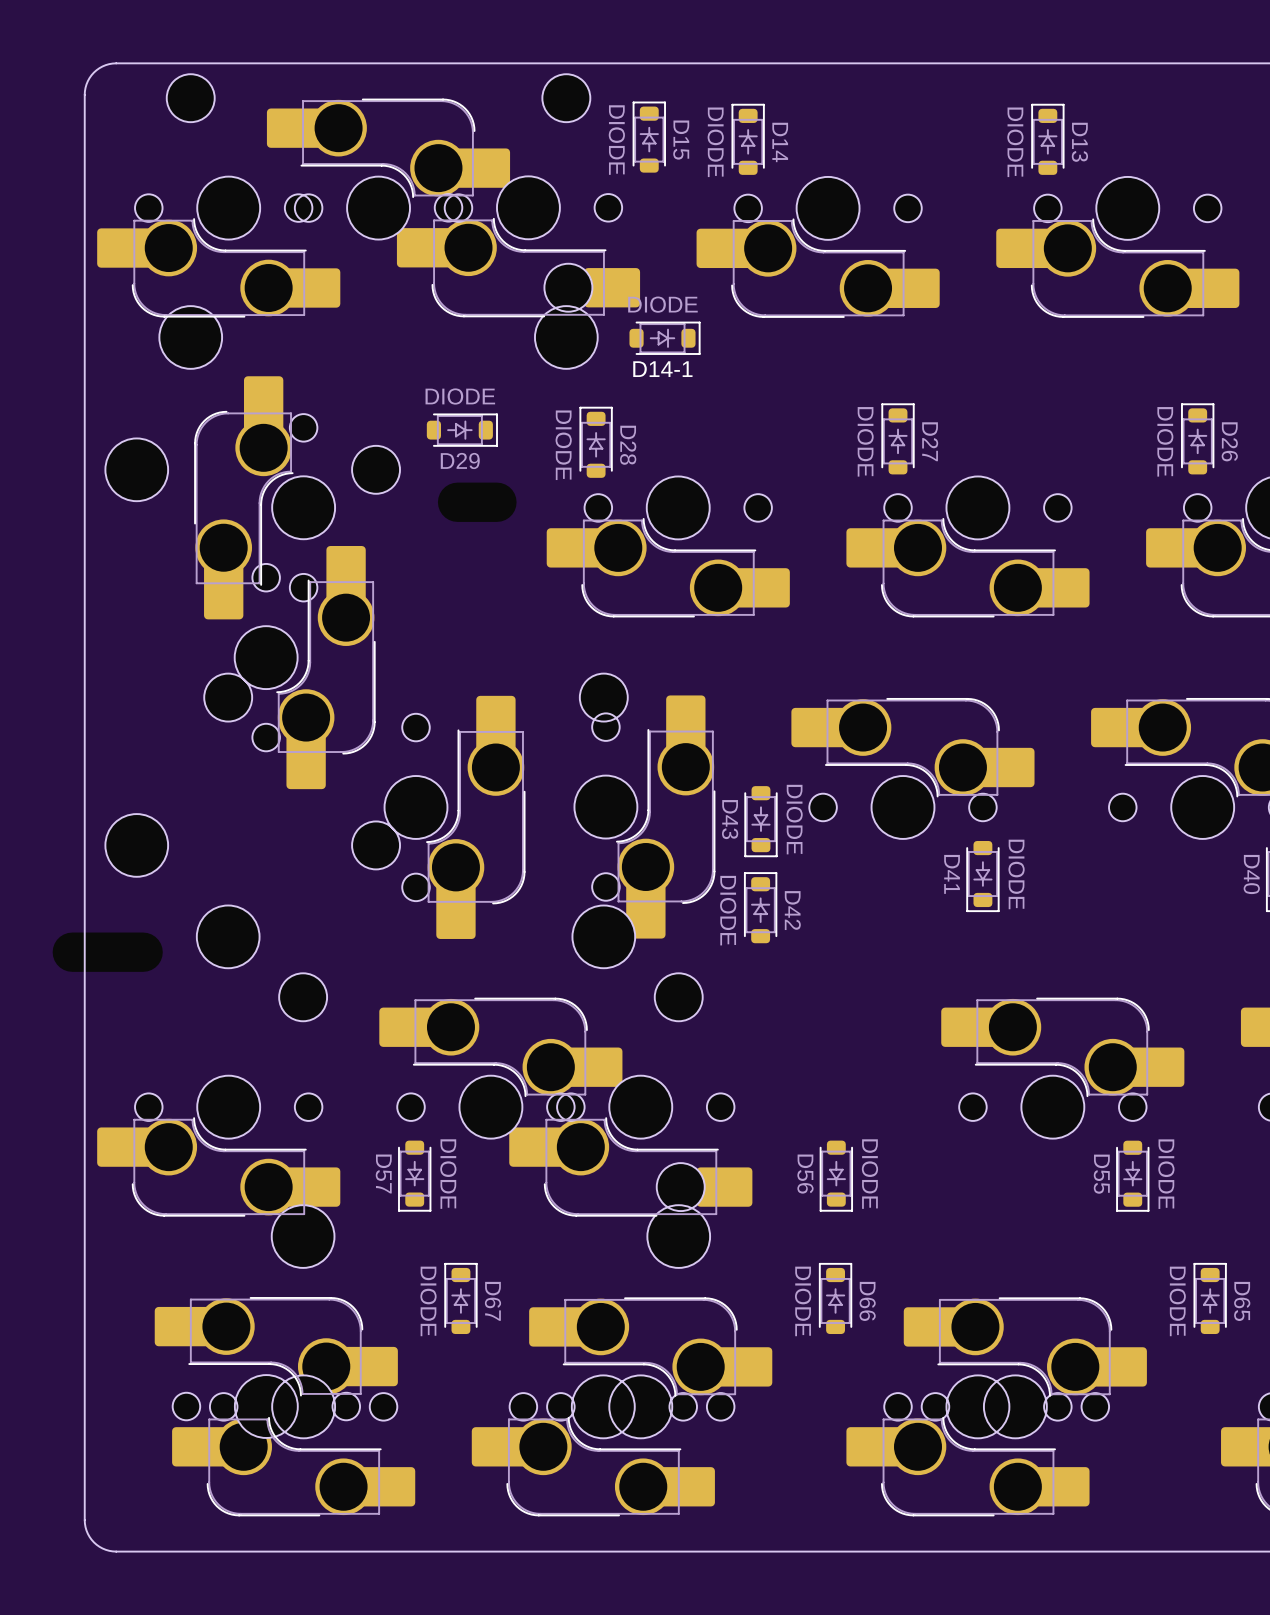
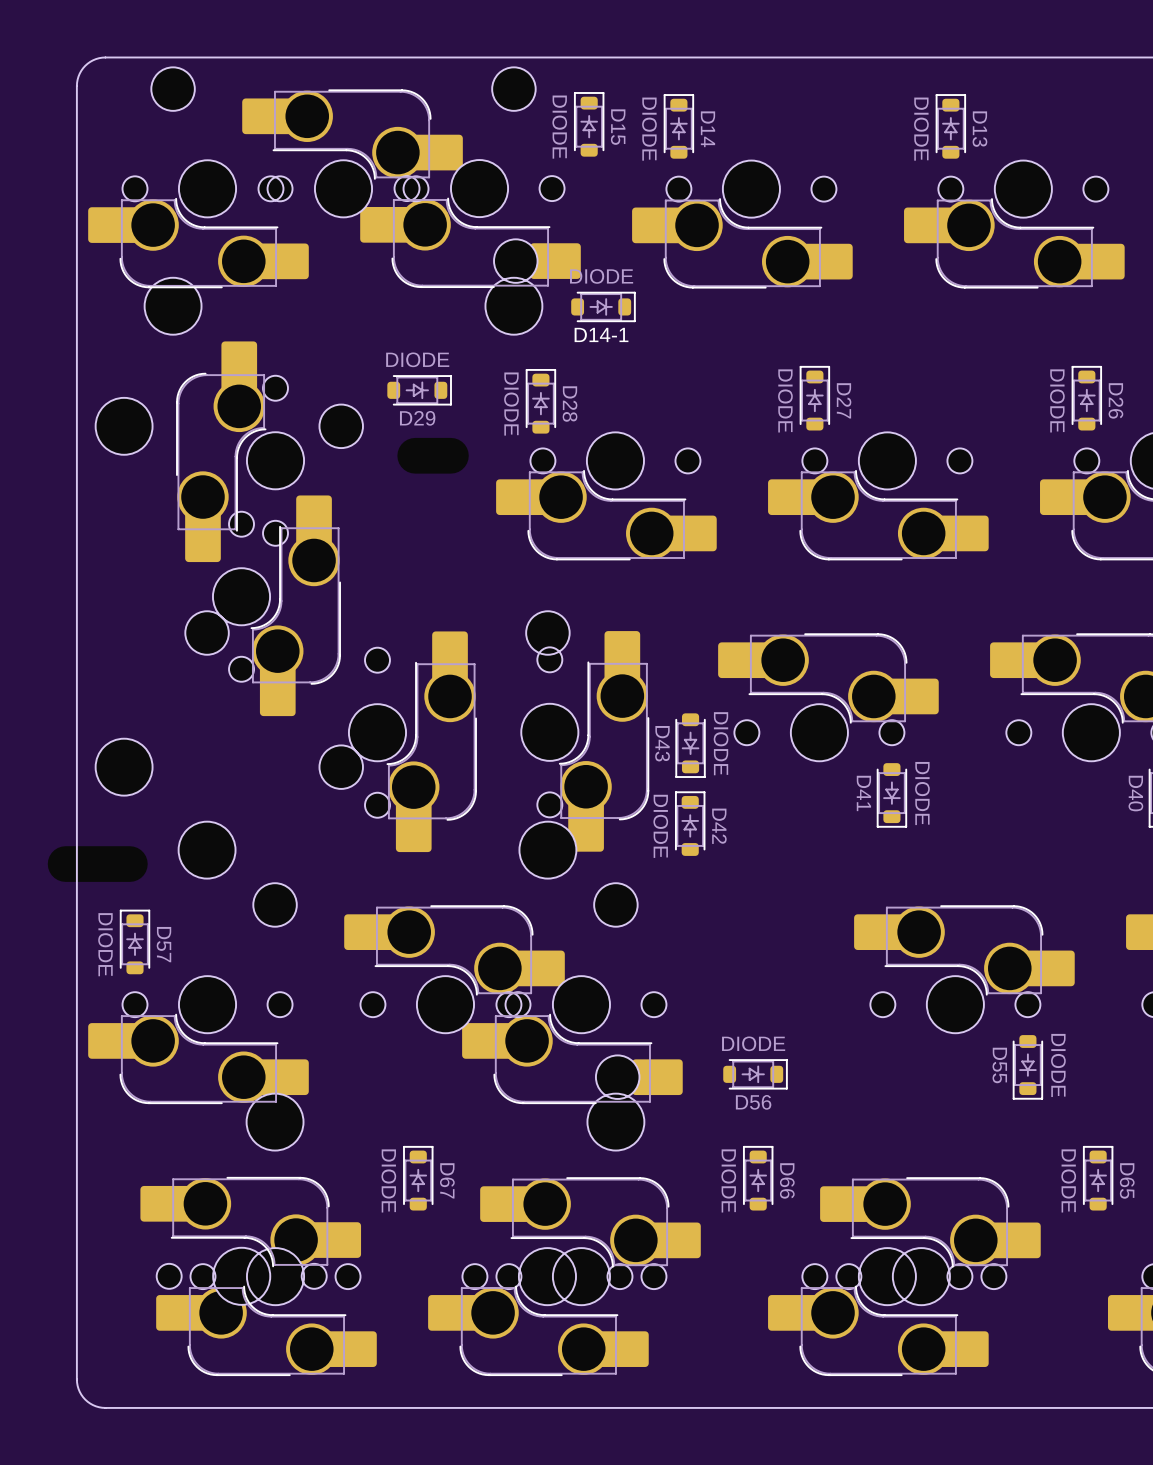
D57 rotation: 0° (414, 1176) -> 180° (135, 942)
D57 position: (414, 1176) -> (135, 942)
D56 rotation: 0° (836, 1176) -> 90° counterclockwise (755, 1074)

